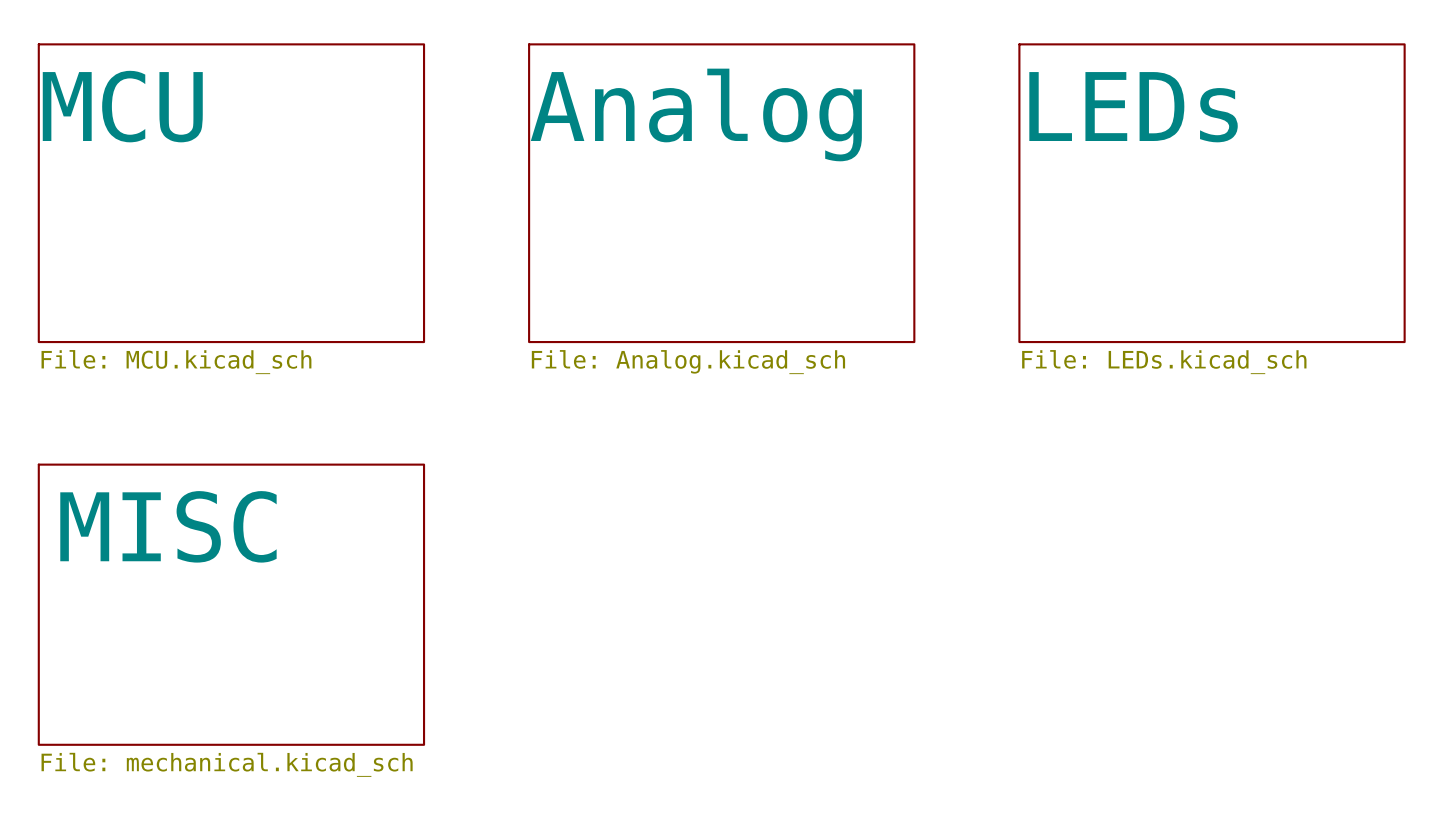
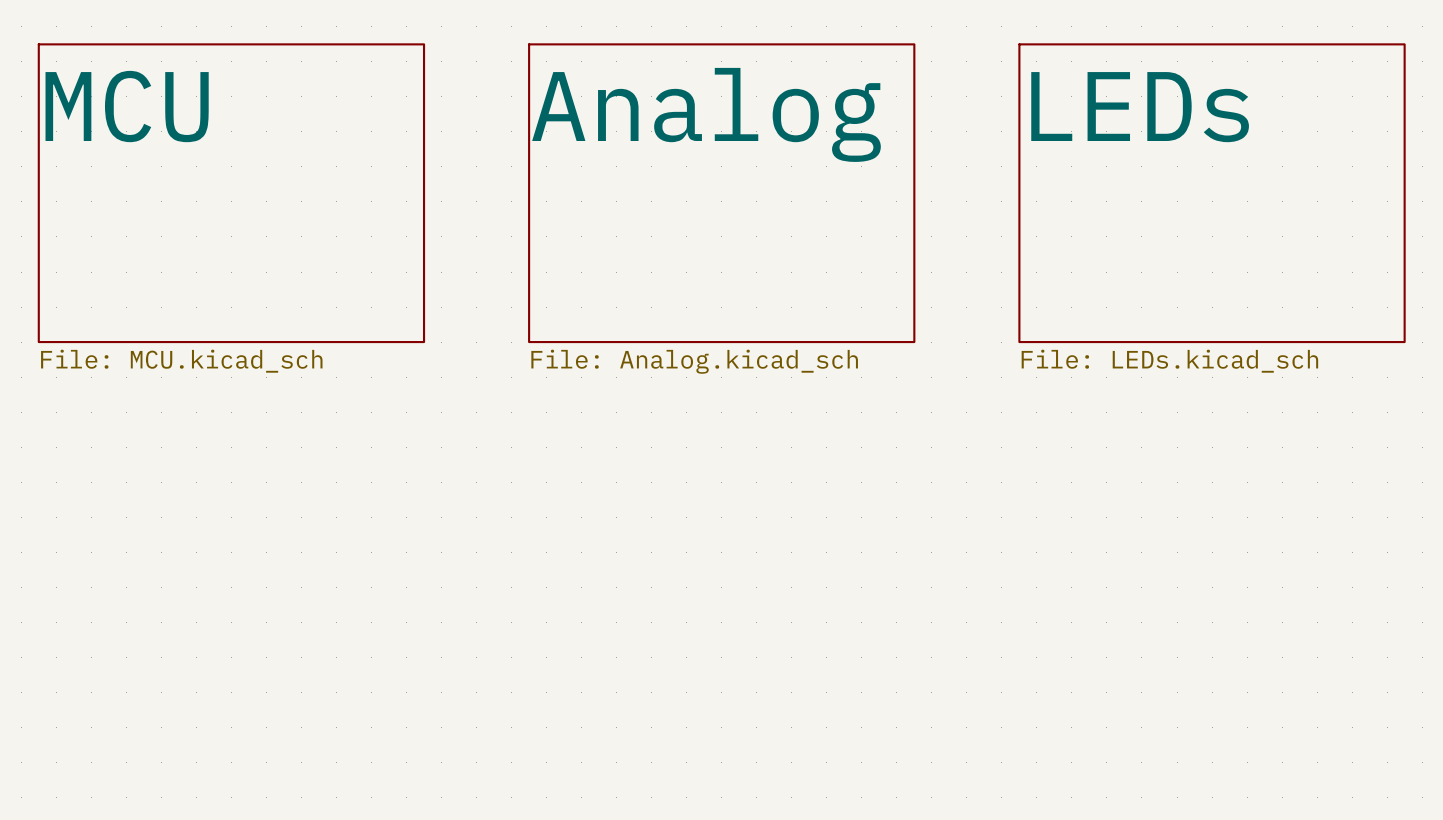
sheet MISC: File: mechanical.kicad_sch (231, 604) -> none

